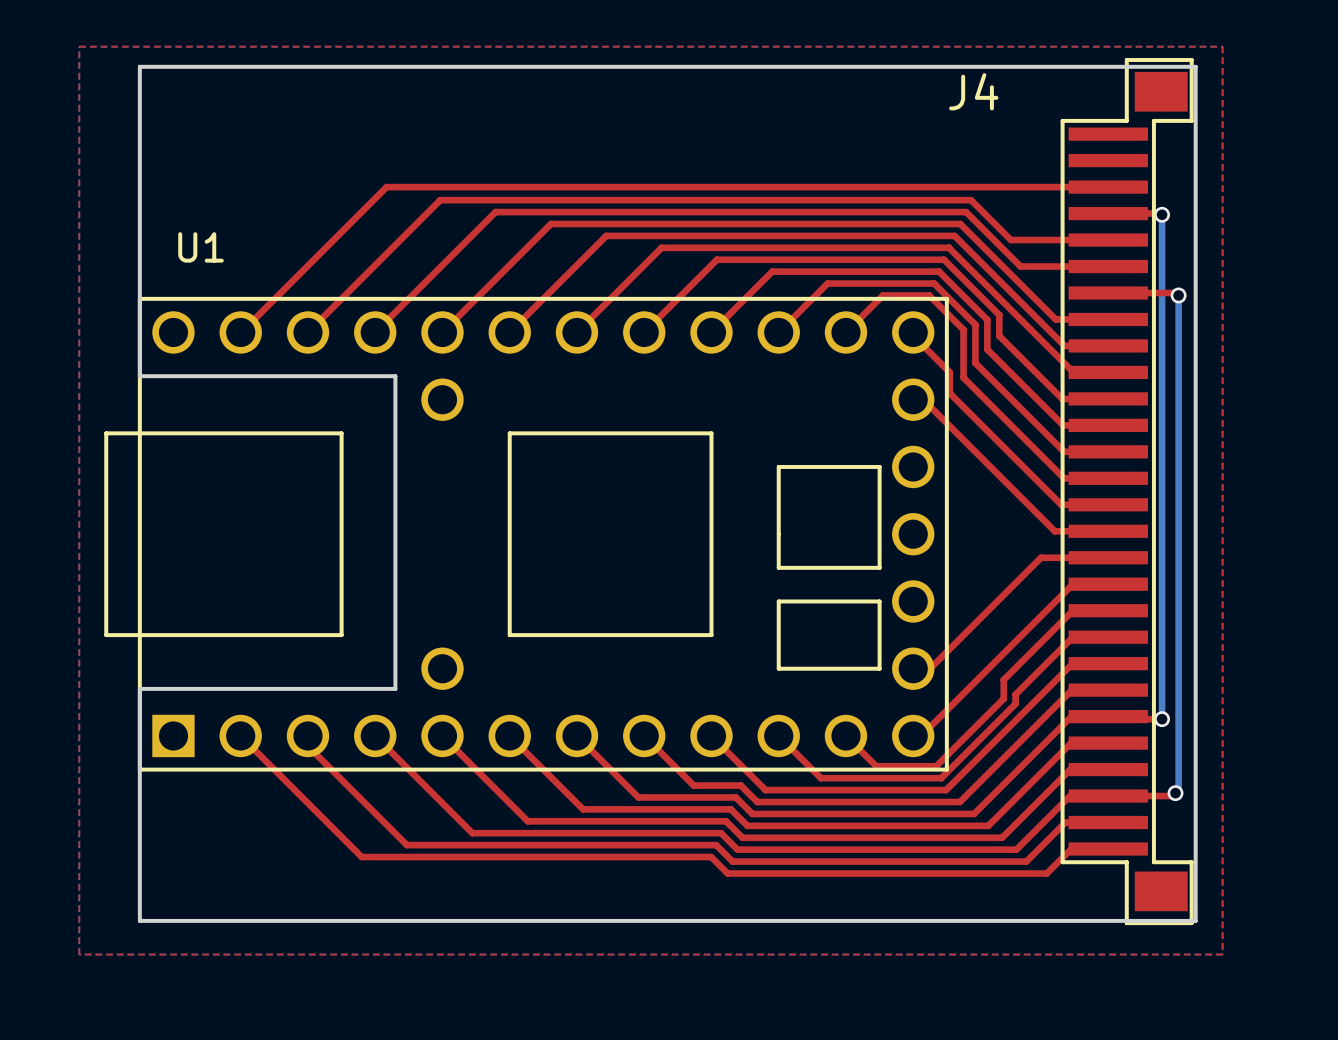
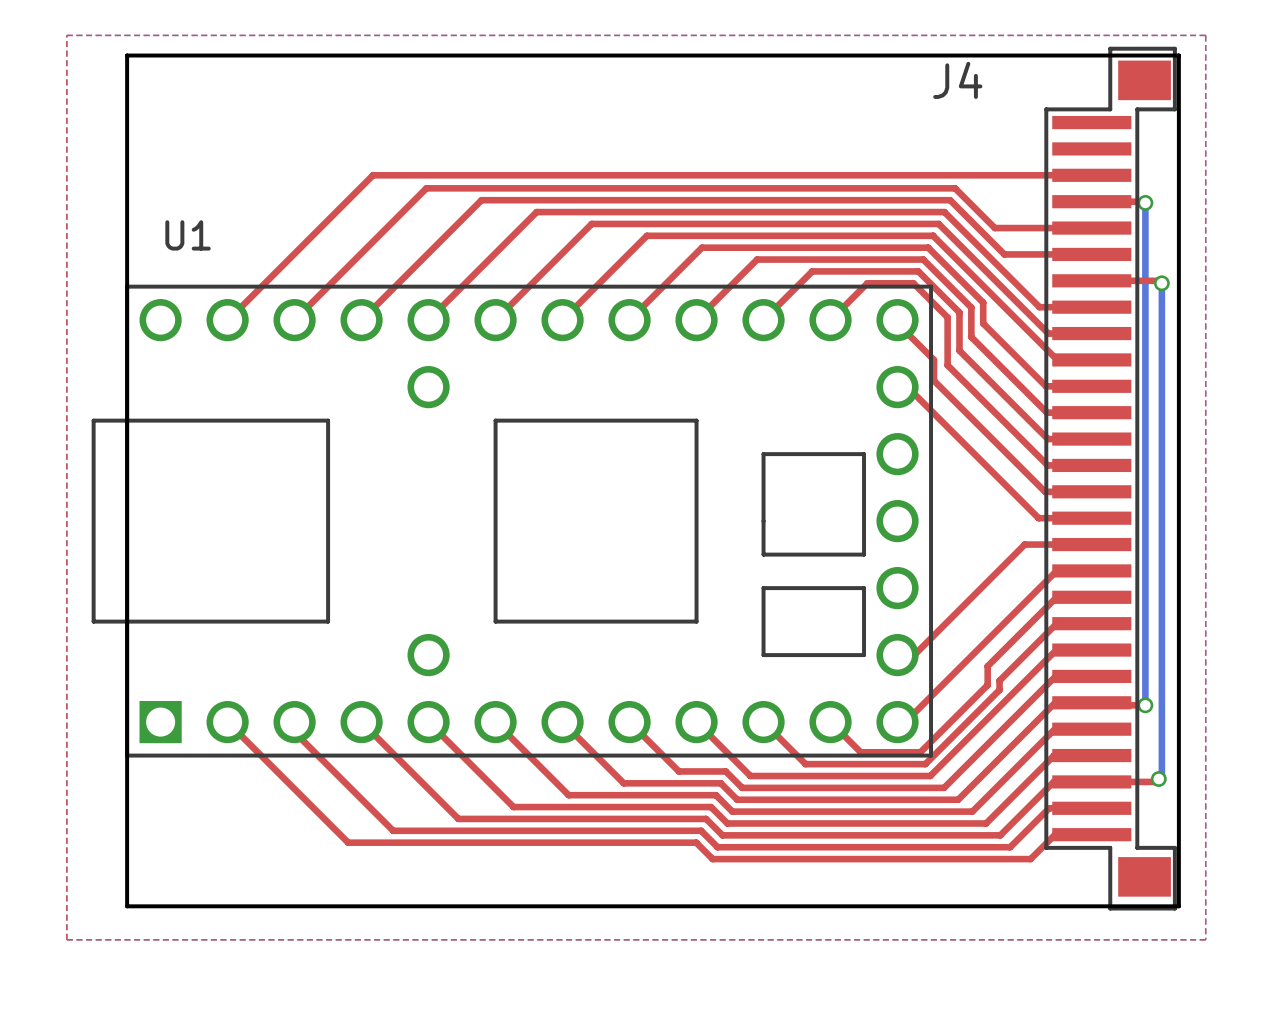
board edge: (139, 376) (395, 376) (395, 688) (139, 688) -> (127, 363) (127, 675)

